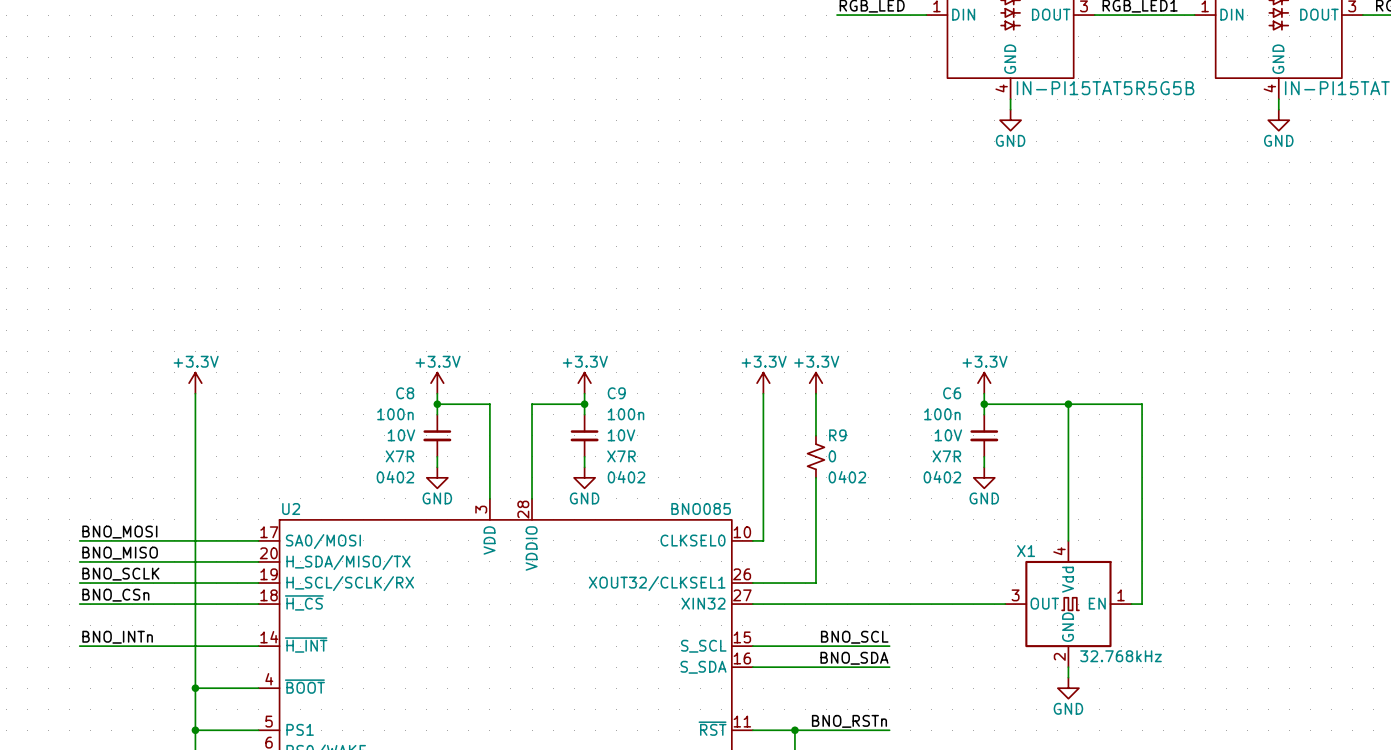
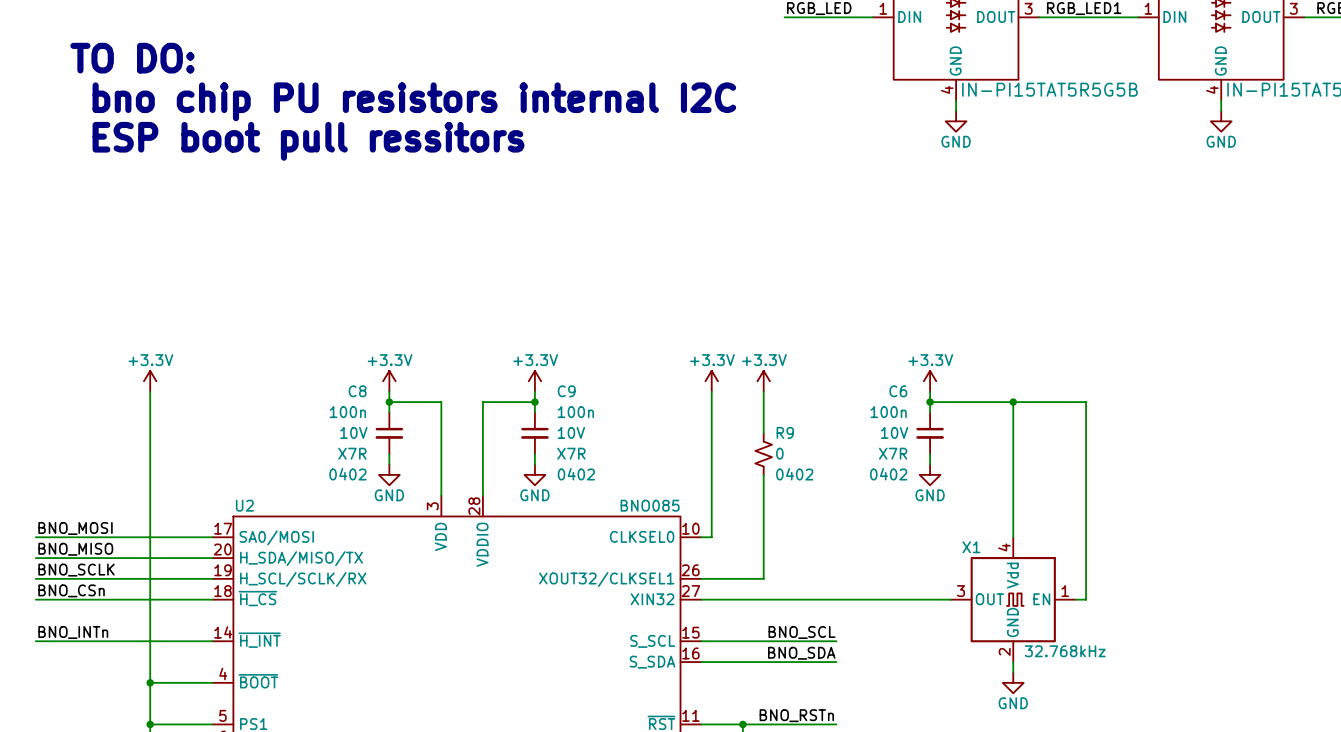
text: none -> TO DO: (132, 58)
text: none -> bno chip PU resistors internal I2C (414, 101)
text: none -> ESP boot pull ressitors (308, 141)

